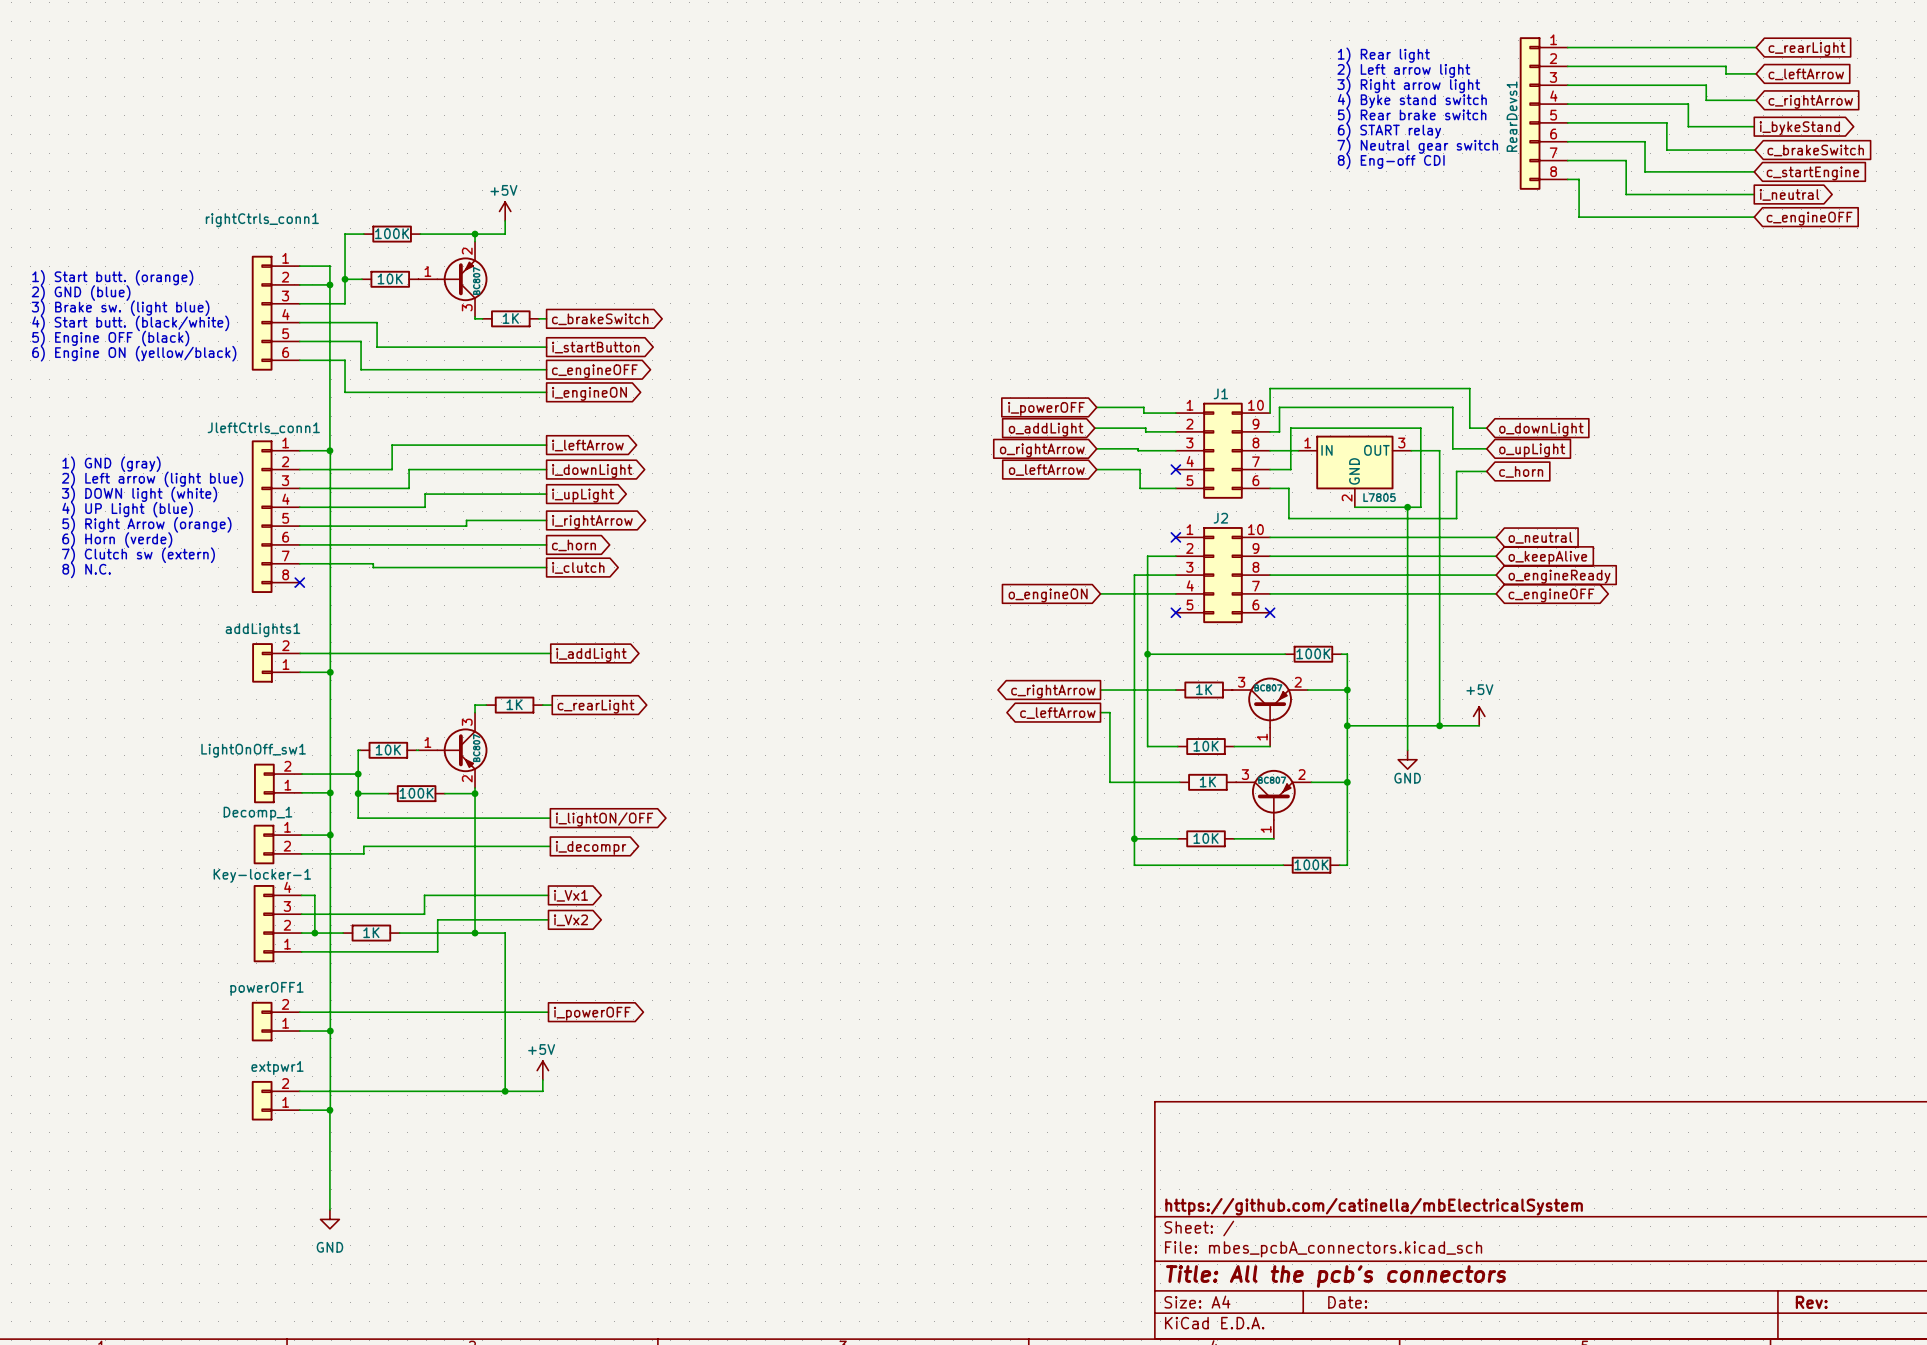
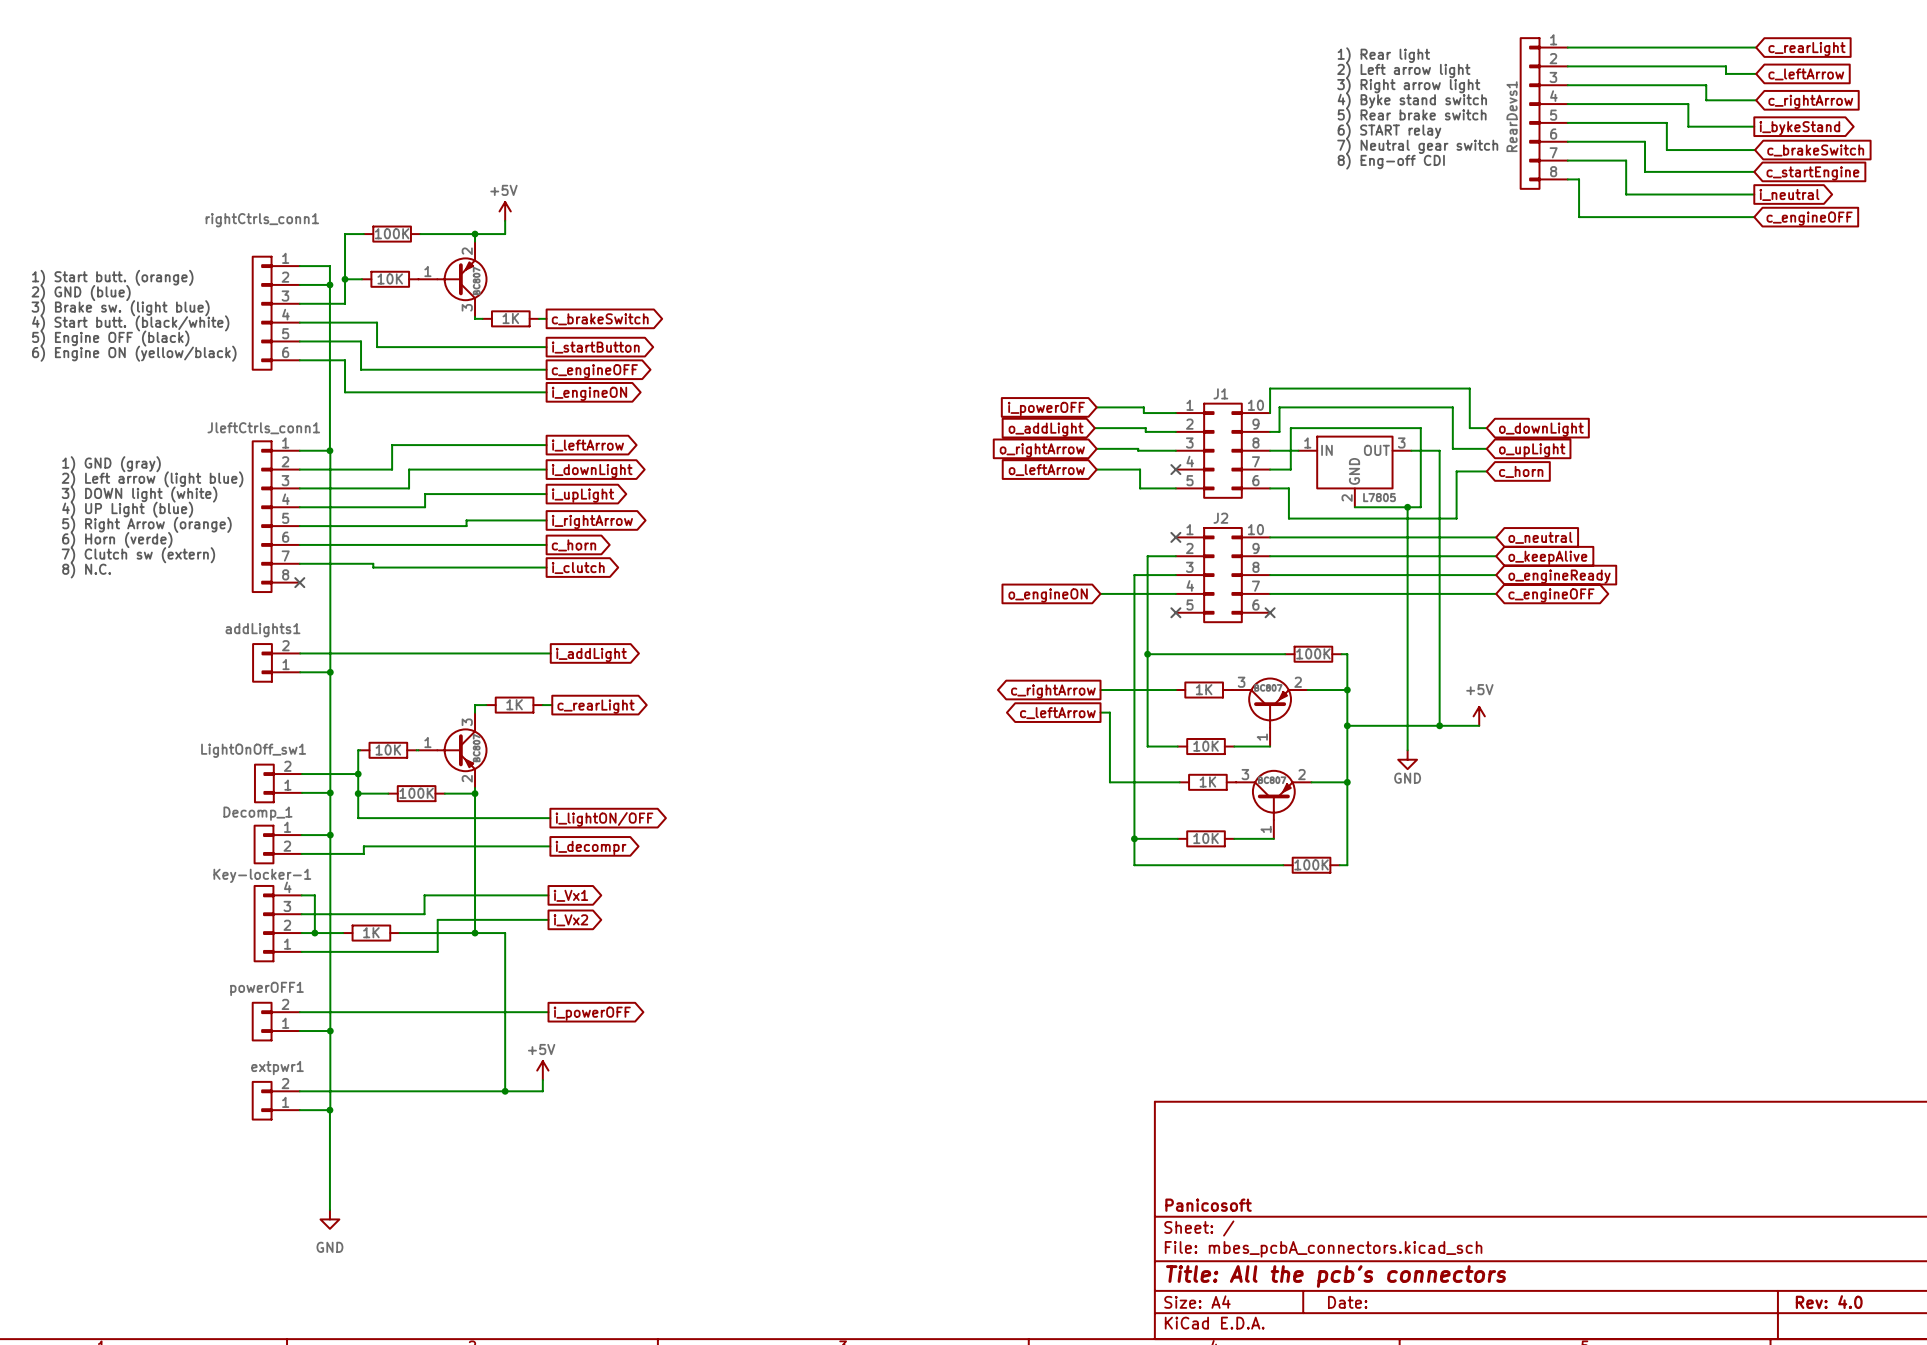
title block: https://github.com/catinella/mbElectricalSystem (1374, 1206) -> Panicosoft (1208, 1205)
title block: Rev: (1811, 1302) -> Rev: 4.0 (1829, 1302)

